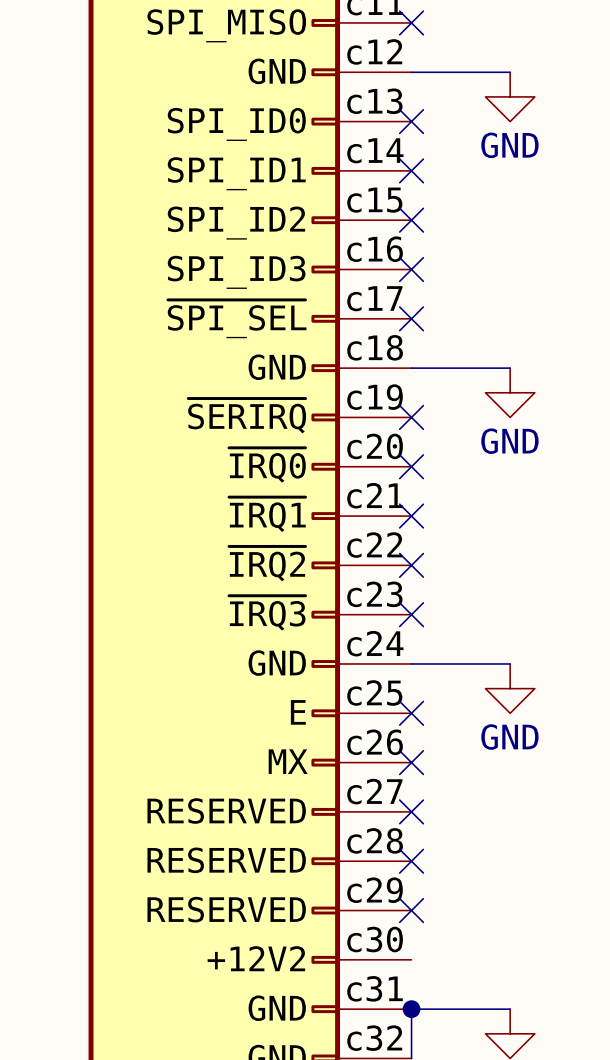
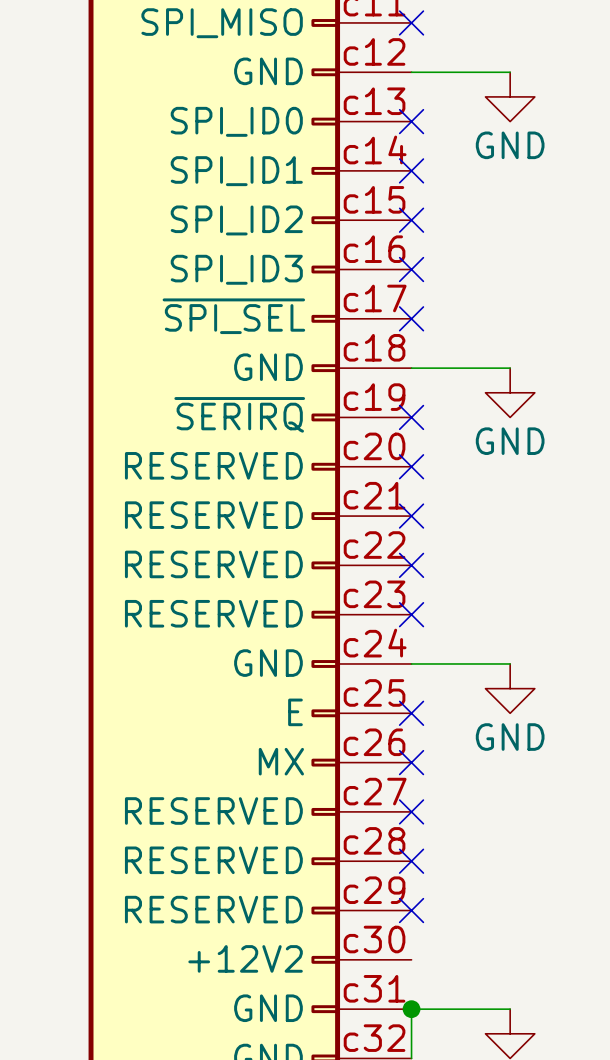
part pin name: ~{IRQ0} (267, 465) -> RESERVED (213, 465)
part pin name: ~{IRQ1} (267, 514) -> RESERVED (213, 515)
part pin name: ~{IRQ2} (267, 563) -> RESERVED (213, 564)
part pin name: ~{IRQ3} (267, 613) -> RESERVED (213, 613)

